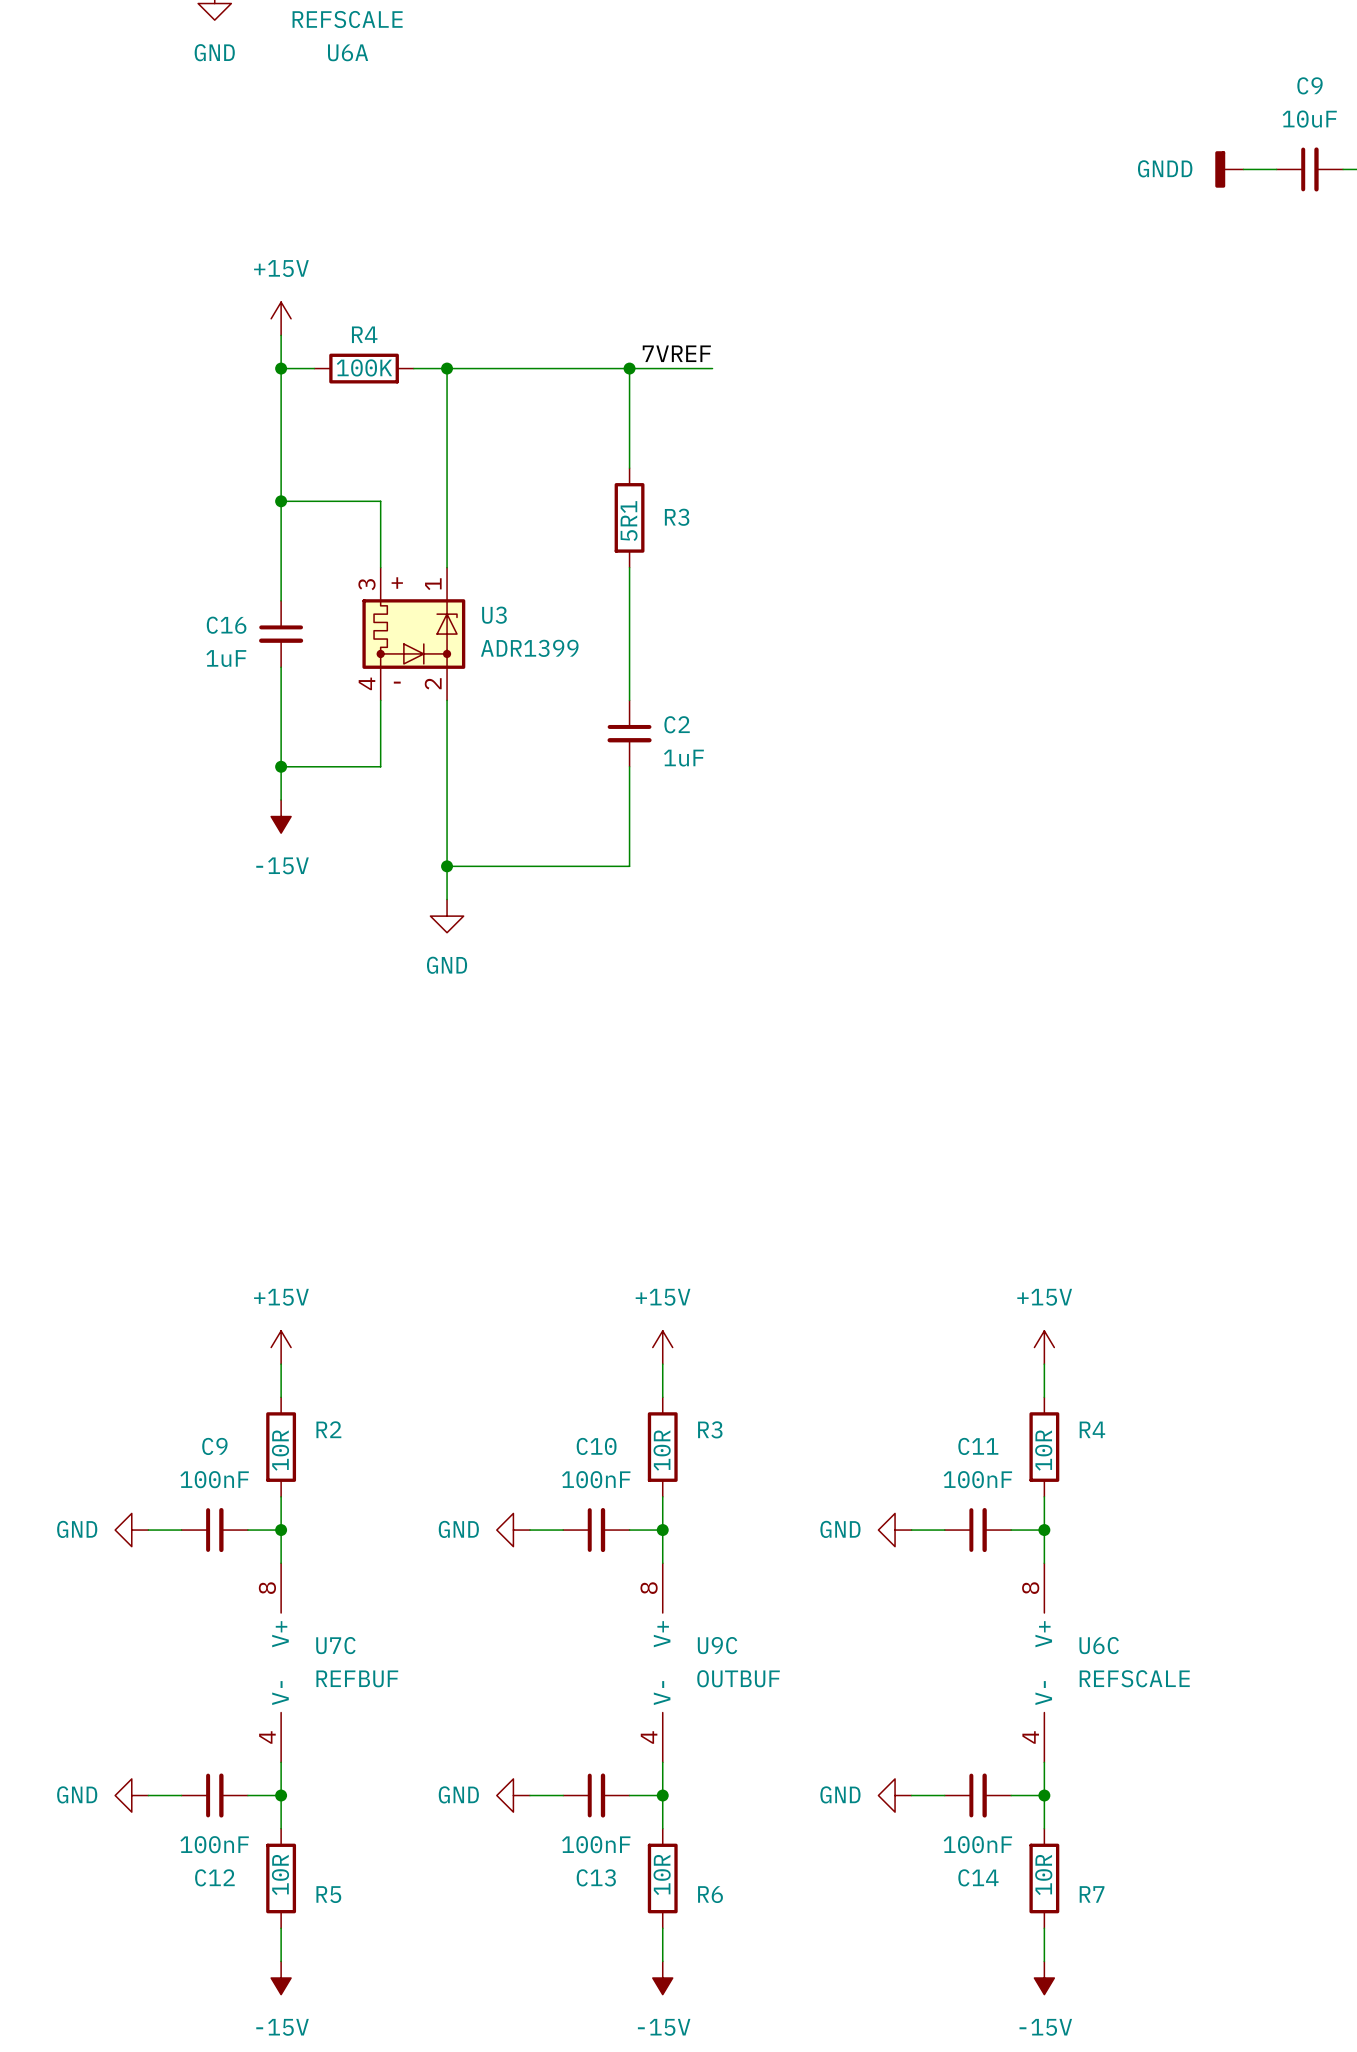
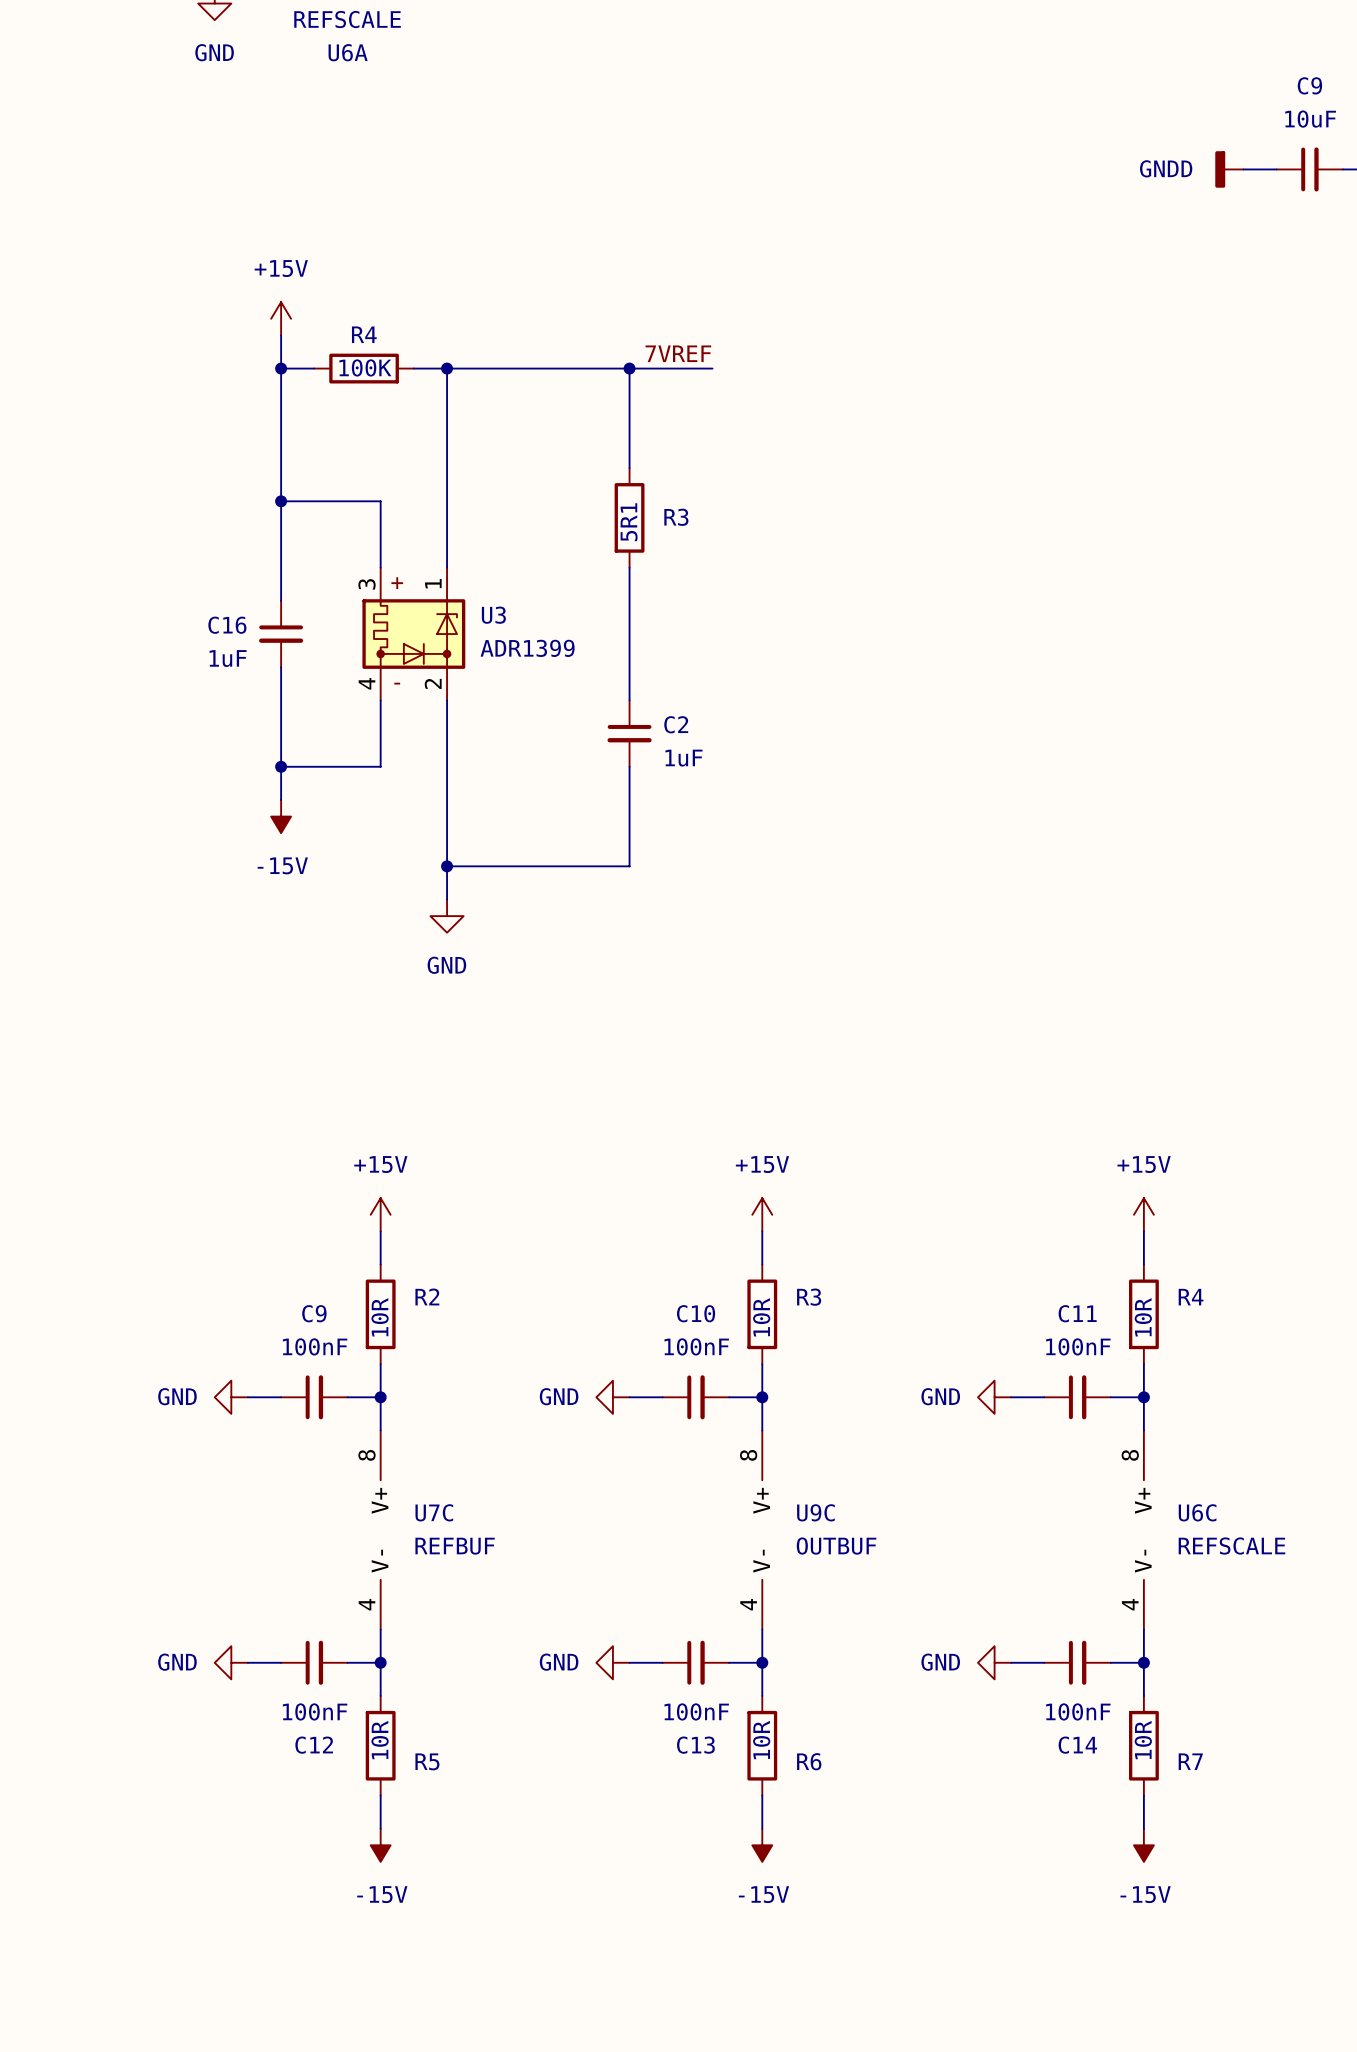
power symbol: none -> +15V (380, 1214)
power symbol: none -> +15V (762, 1214)
power symbol: none -> +15V (1143, 1214)
wire: none -> (380, 1231) (380, 1264)
wire: none -> (762, 1231) (762, 1264)
wire: none -> (1143, 1231) (1143, 1264)
power symbol: +15V (281, 1347) -> none
power symbol: +15V (662, 1347) -> none
power symbol: +15V (1044, 1347) -> none
wire: (281, 1364) (281, 1397) -> (247, 1397) (281, 1397)
wire: (662, 1364) (662, 1397) -> (629, 1397) (662, 1397)
wire: (1044, 1364) (1044, 1397) -> (1011, 1397) (1044, 1397)
power symbol: none -> GND (231, 1397)
junction: none -> (380, 1397)
power symbol: none -> GND (612, 1397)
junction: none -> (762, 1397)
power symbol: none -> GND (994, 1397)
junction: none -> (1143, 1397)
R2 position: (281, 1447) -> (380, 1314)
R3 position: (662, 1447) -> (762, 1314)
R4 position: (1044, 1447) -> (1143, 1314)
wire: (281, 1496) (281, 1563) -> (380, 1364) (380, 1430)
wire: (662, 1496) (662, 1563) -> (762, 1364) (762, 1430)
wire: (1044, 1496) (1044, 1563) -> (1143, 1364) (1143, 1430)
power symbol: GND (131, 1530) -> none
wire: (148, 1530) (181, 1530) -> none
C9 position: (214, 1530) -> (314, 1397)
wire: (247, 1530) (281, 1530) -> (347, 1397) (380, 1397)
junction: (281, 1530) -> none
power symbol: GND (513, 1530) -> none
wire: (530, 1530) (563, 1530) -> none
C10 position: (596, 1530) -> (695, 1397)
wire: (629, 1530) (662, 1530) -> (729, 1397) (762, 1397)
junction: (662, 1530) -> none
power symbol: GND (895, 1530) -> none
wire: (911, 1530) (944, 1530) -> none
C11 position: (978, 1530) -> (1077, 1397)
wire: (1011, 1530) (1044, 1530) -> (1110, 1397) (1143, 1397)
junction: (1044, 1530) -> none
power symbol: none -> GND (231, 1662)
U7C position: (281, 1662) -> (380, 1530)
junction: none -> (380, 1662)
power symbol: none -> GND (612, 1662)
U9C position: (662, 1662) -> (762, 1530)
junction: none -> (762, 1662)
power symbol: none -> GND (994, 1662)
U6C position: (1044, 1662) -> (1143, 1530)
junction: none -> (1143, 1662)
wire: (281, 1762) (281, 1828) -> (380, 1629) (380, 1695)
wire: (662, 1762) (662, 1828) -> (762, 1629) (762, 1695)
wire: (1044, 1762) (1044, 1828) -> (1143, 1629) (1143, 1695)
power symbol: GND (131, 1795) -> none
wire: (148, 1795) (181, 1795) -> (247, 1662) (281, 1662)
C12 position: (214, 1795) -> (314, 1662)
wire: (247, 1795) (281, 1795) -> (347, 1662) (380, 1662)
junction: (281, 1795) -> none
power symbol: GND (513, 1795) -> none
wire: (530, 1795) (563, 1795) -> (629, 1662) (662, 1662)
C13 position: (596, 1795) -> (695, 1662)
wire: (629, 1795) (662, 1795) -> (729, 1662) (762, 1662)
junction: (662, 1795) -> none
power symbol: GND (895, 1795) -> none
wire: (911, 1795) (944, 1795) -> (1011, 1662) (1044, 1662)
C14 position: (978, 1795) -> (1077, 1662)
wire: (1011, 1795) (1044, 1795) -> (1110, 1662) (1143, 1662)
junction: (1044, 1795) -> none
power symbol: none -> -15V (380, 1845)
power symbol: none -> -15V (762, 1845)
power symbol: none -> -15V (1143, 1845)
R5 position: (281, 1878) -> (380, 1745)
R6 position: (662, 1878) -> (762, 1745)
R7 position: (1044, 1878) -> (1143, 1745)
wire: (281, 1928) (281, 1961) -> (380, 1795) (380, 1828)
wire: (662, 1928) (662, 1961) -> (762, 1795) (762, 1828)
wire: (1044, 1928) (1044, 1961) -> (1143, 1795) (1143, 1828)
power symbol: -15V (281, 1978) -> none
power symbol: -15V (662, 1978) -> none
power symbol: -15V (1044, 1978) -> none

